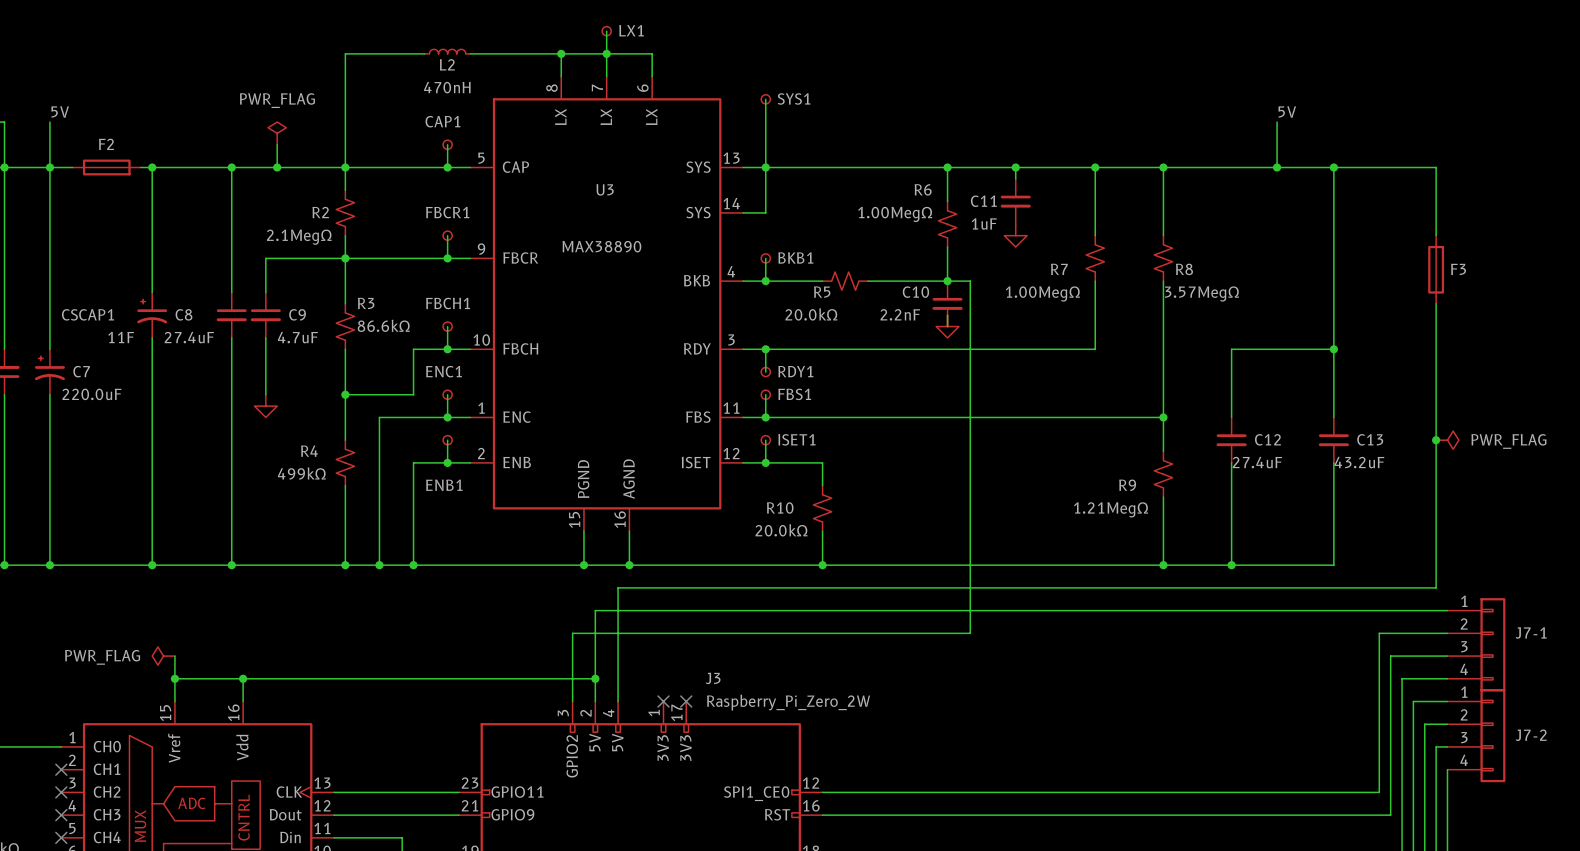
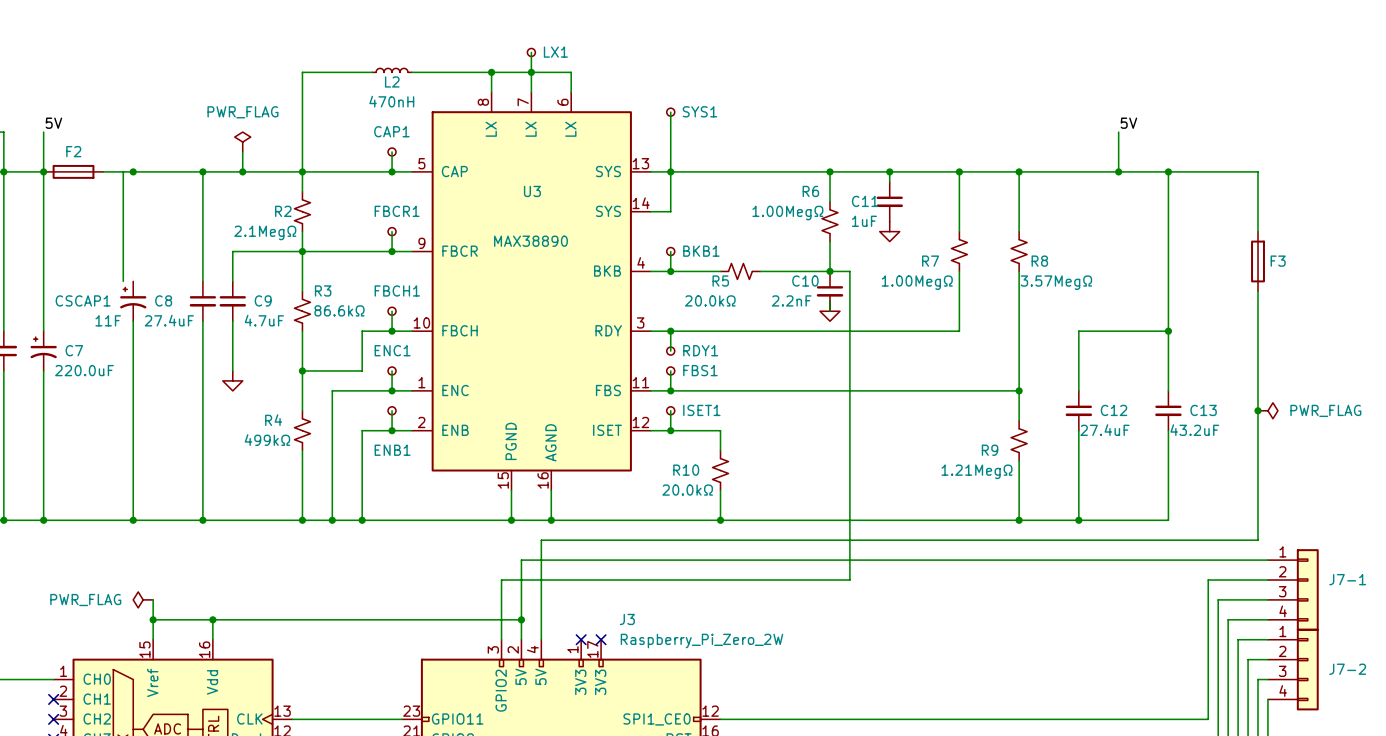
F2 position: (106, 167) -> (73, 171)
wire: none -> (103, 171) (123, 171) (123, 281)
wire: (152, 167) (152, 292) -> none

